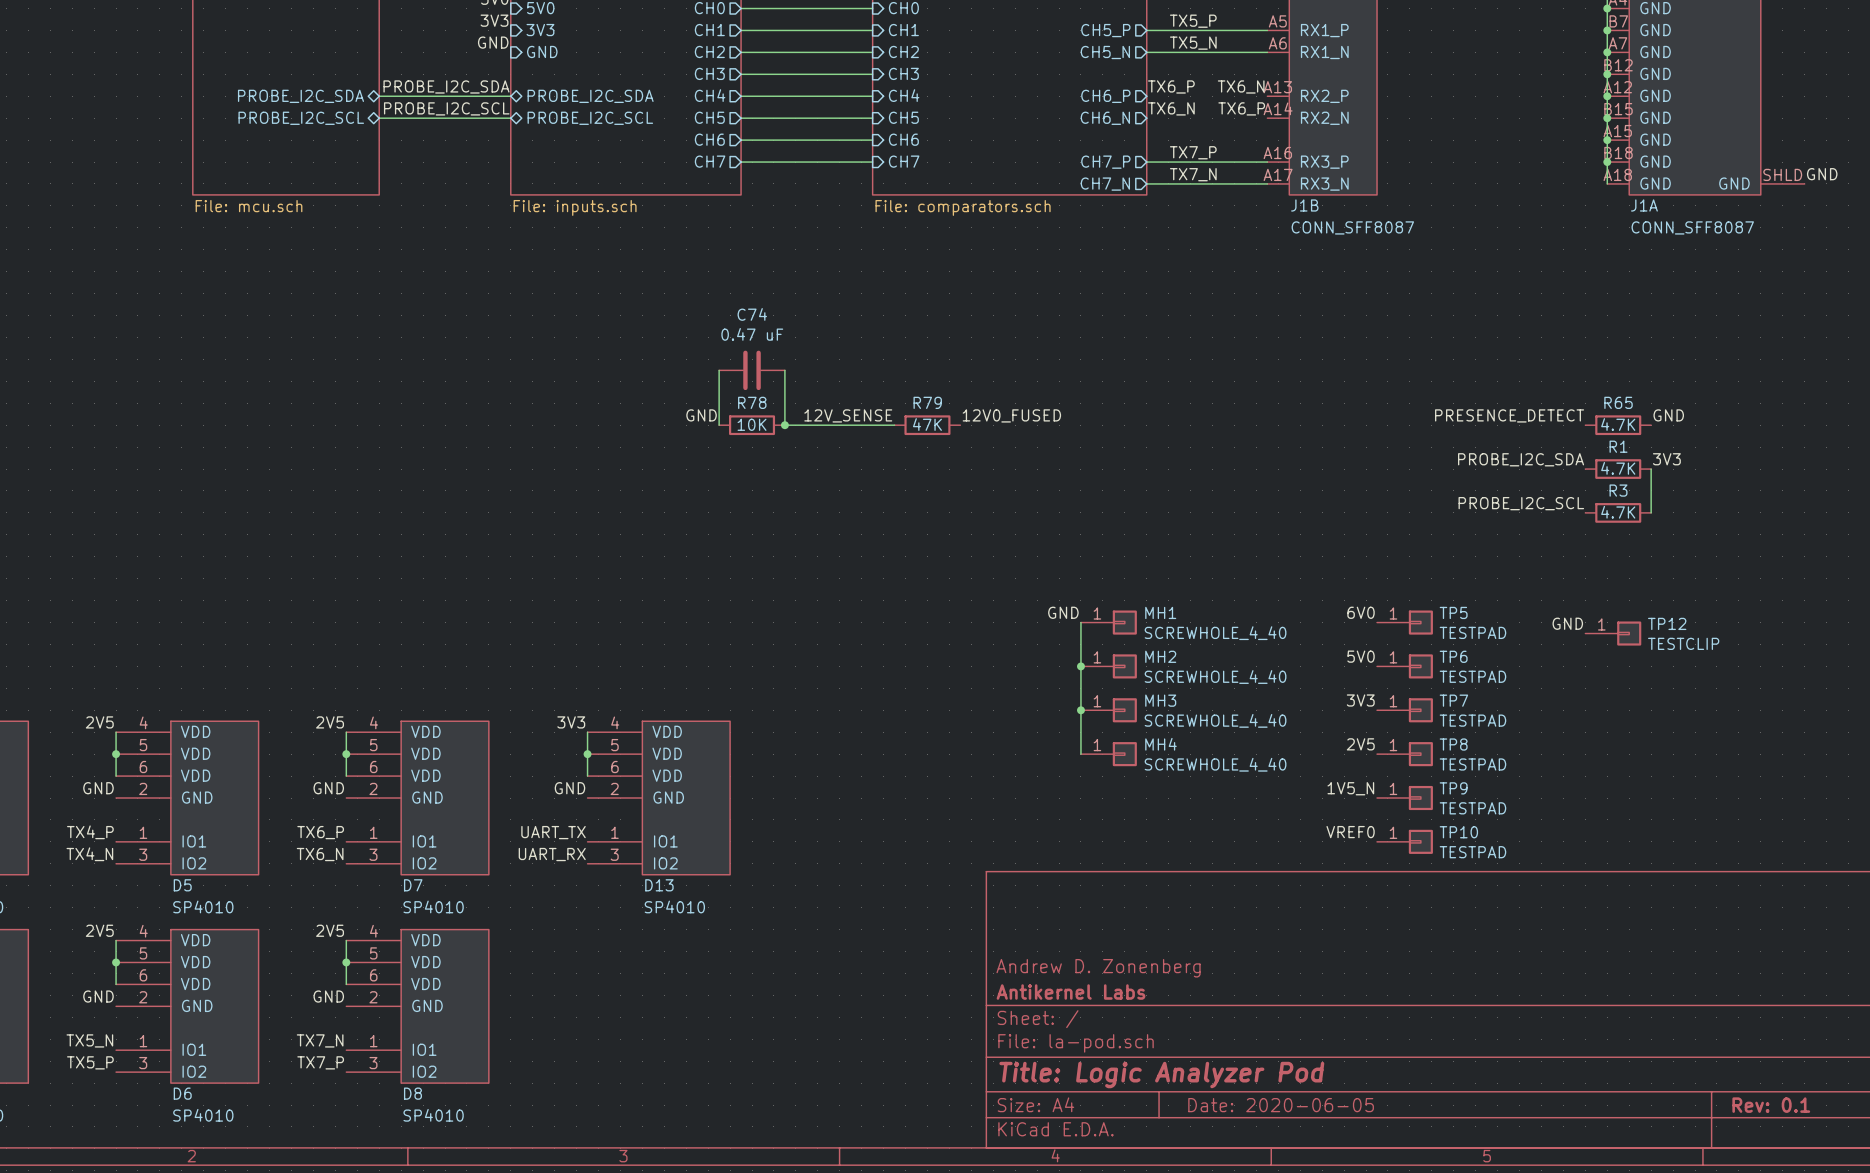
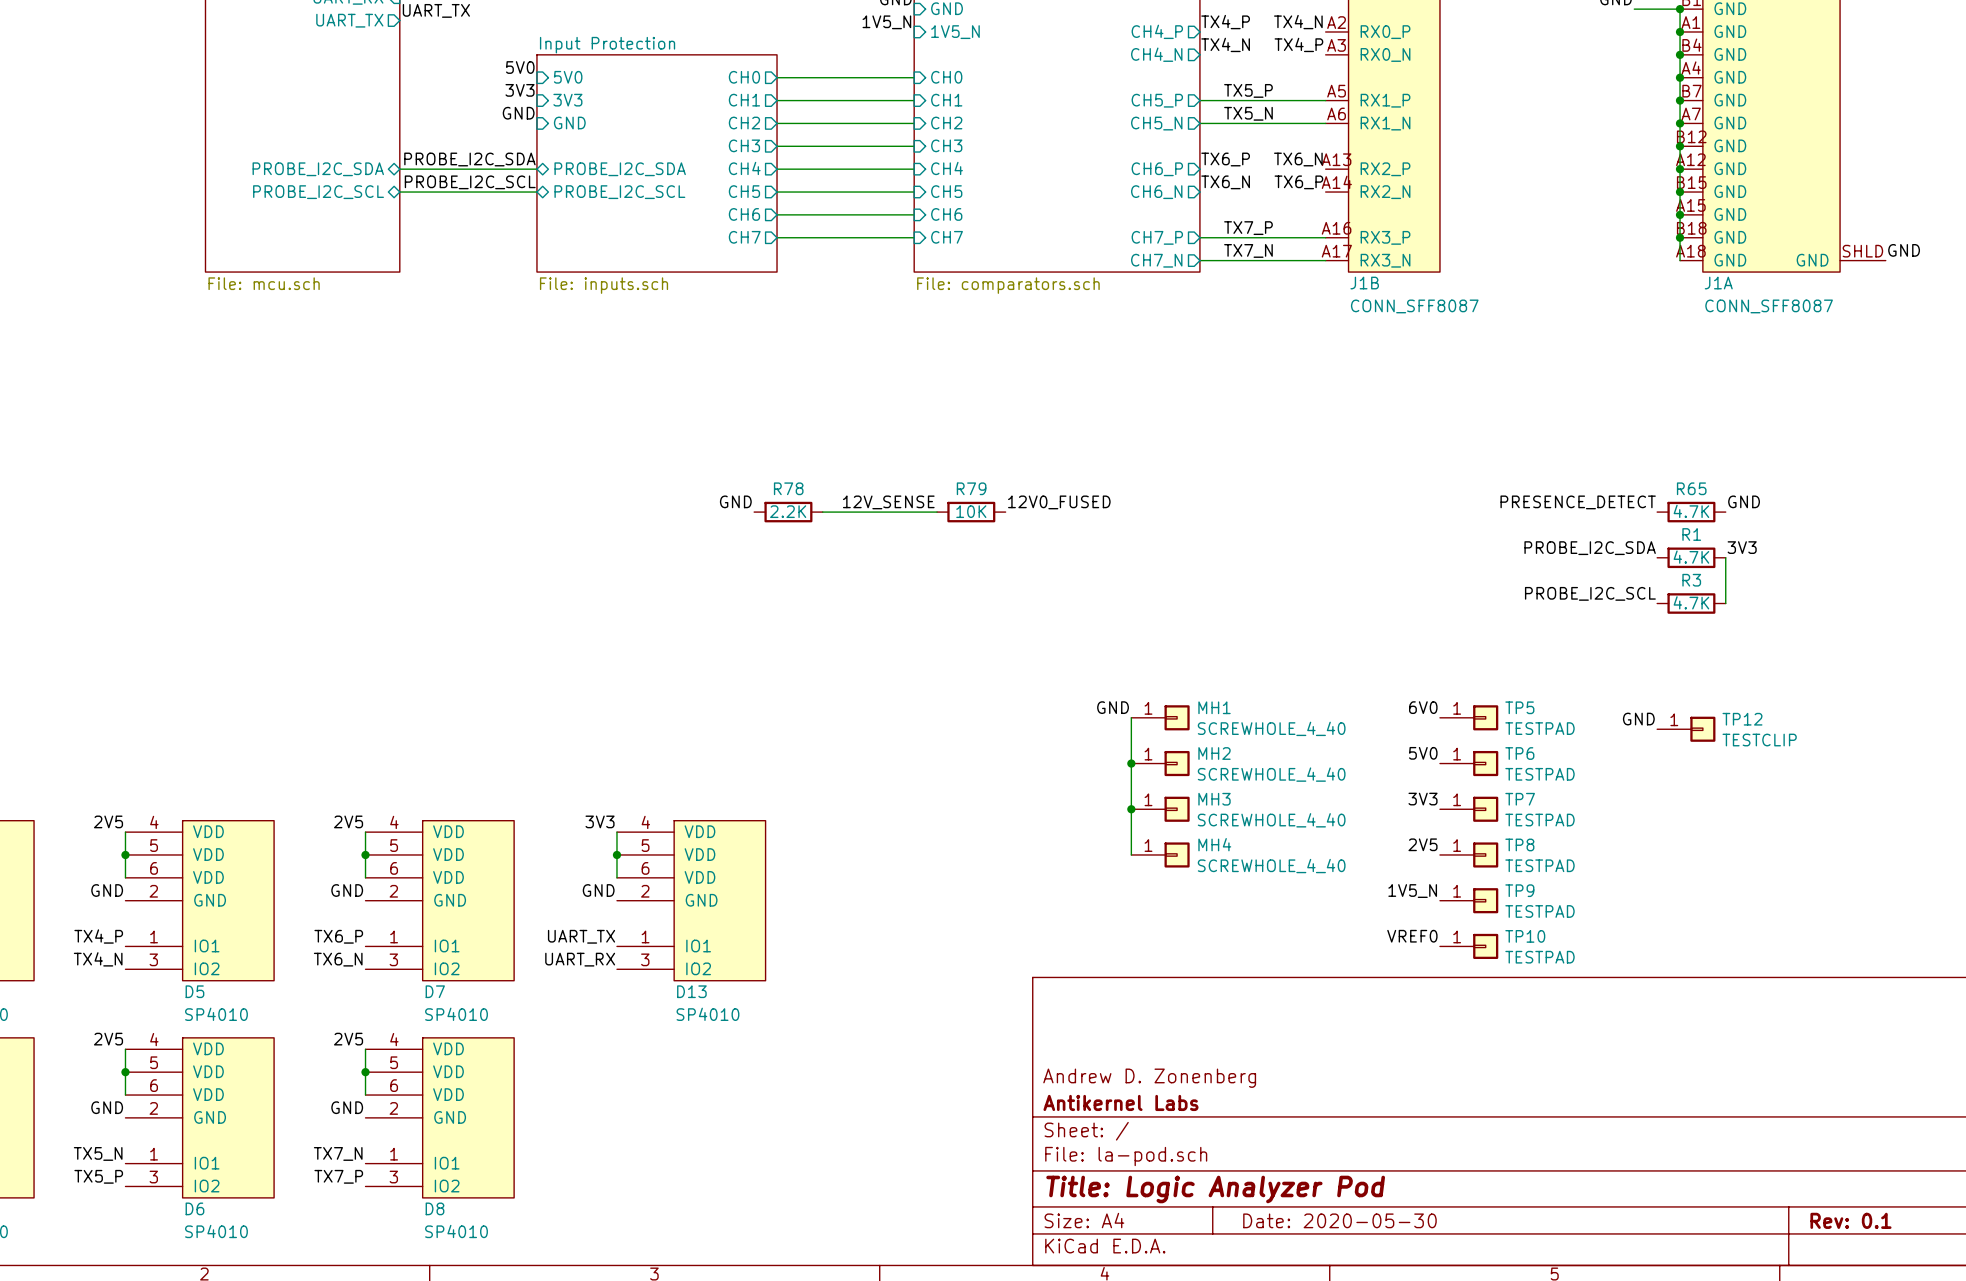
wire: (719, 370) (719, 425) -> none
C74: 0.47 uF (752, 370) -> none
wire: (784, 370) (784, 425) -> none
R78 value: 10K (752, 424) -> 2.2K (788, 511)
R79 value: 47K (927, 424) -> 10K (971, 511)
junction: (784, 425) -> none
title block: Date: 2020-06-05 (1281, 1105) -> Date: 2020-05-30 (1339, 1220)

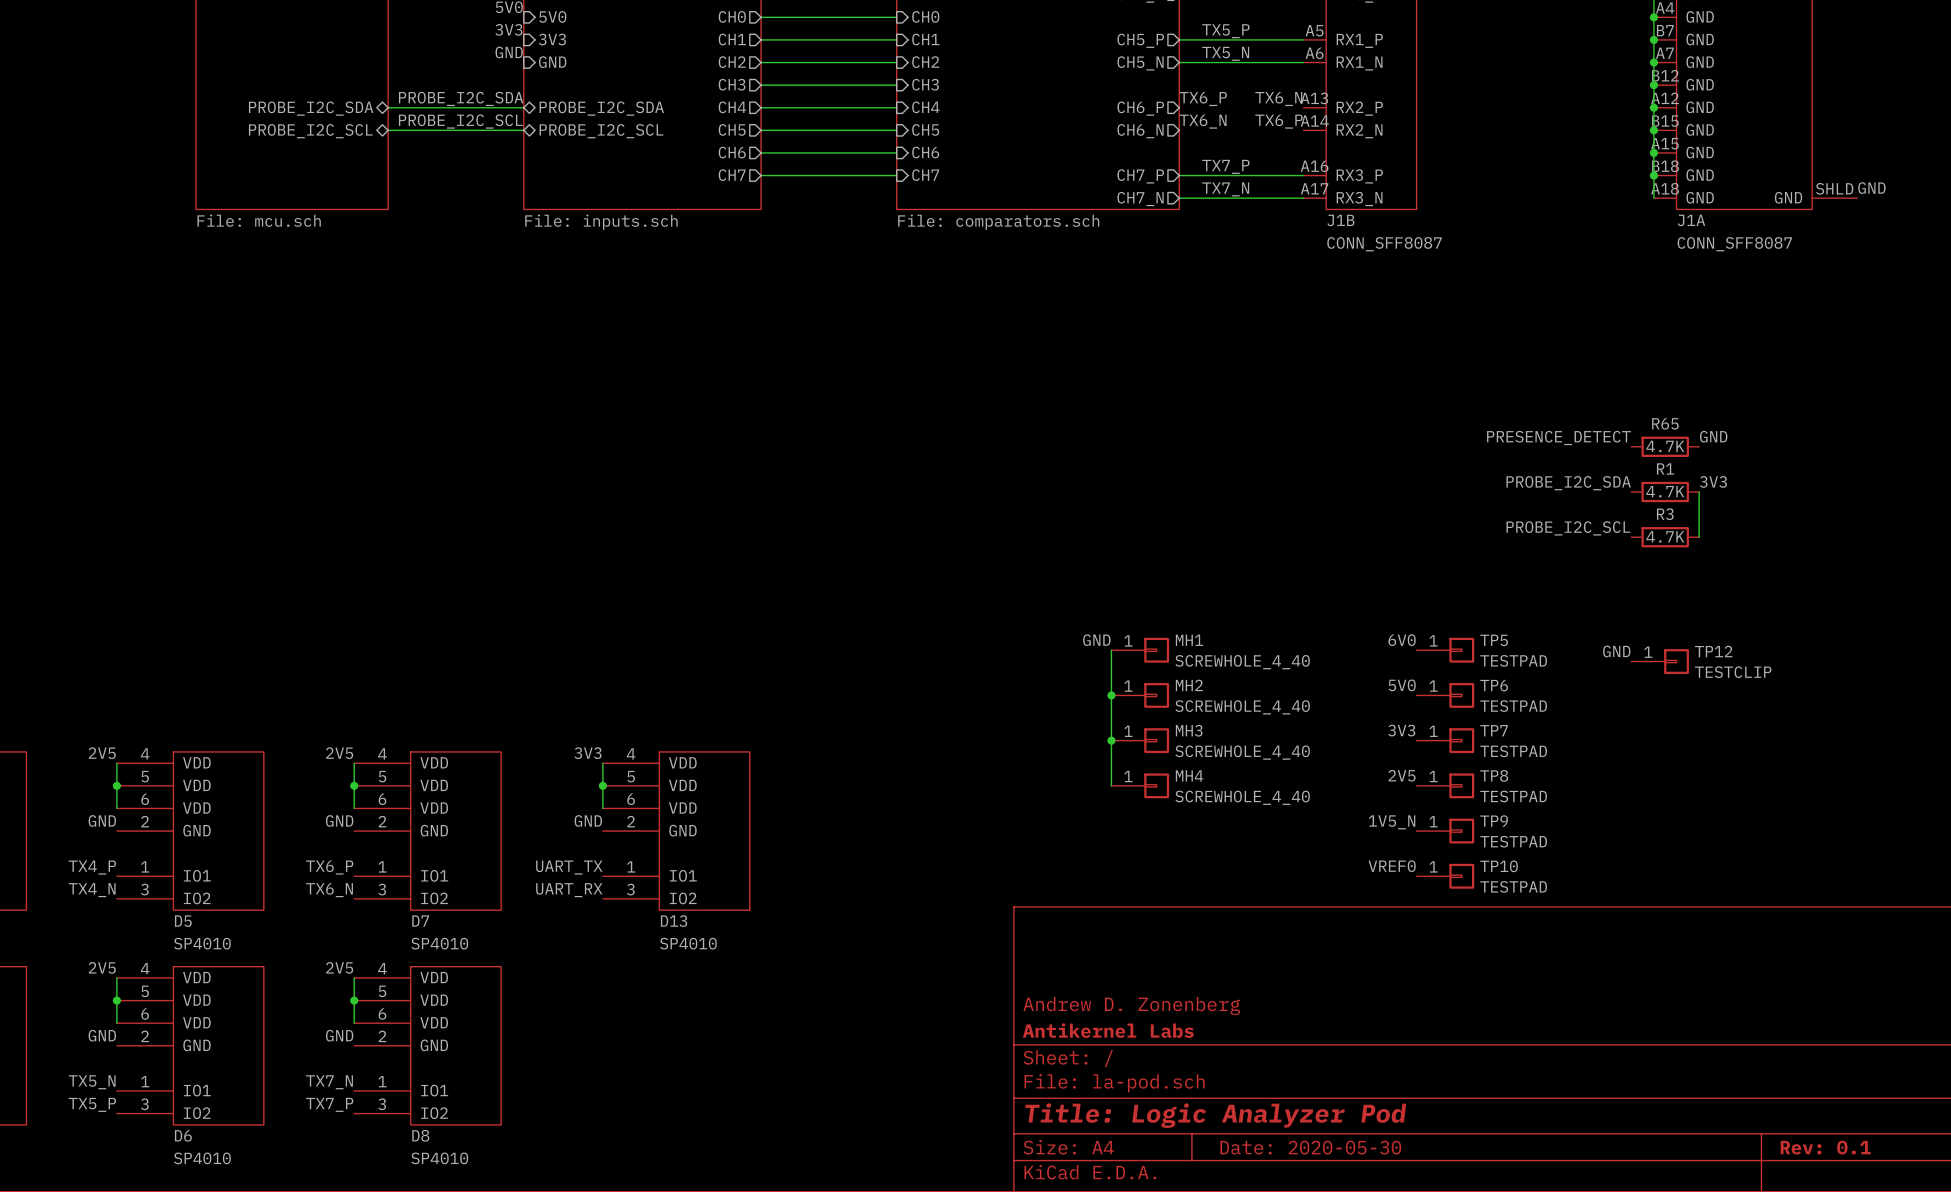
label: GND (735, 501) -> none
label: 12V_SENSE (888, 502) -> none
label: 12V0_FUSED (1059, 502) -> none
R78: 2.2K (788, 512) -> none
wire: (822, 512) (937, 512) -> none
R79: 10K (971, 512) -> none

